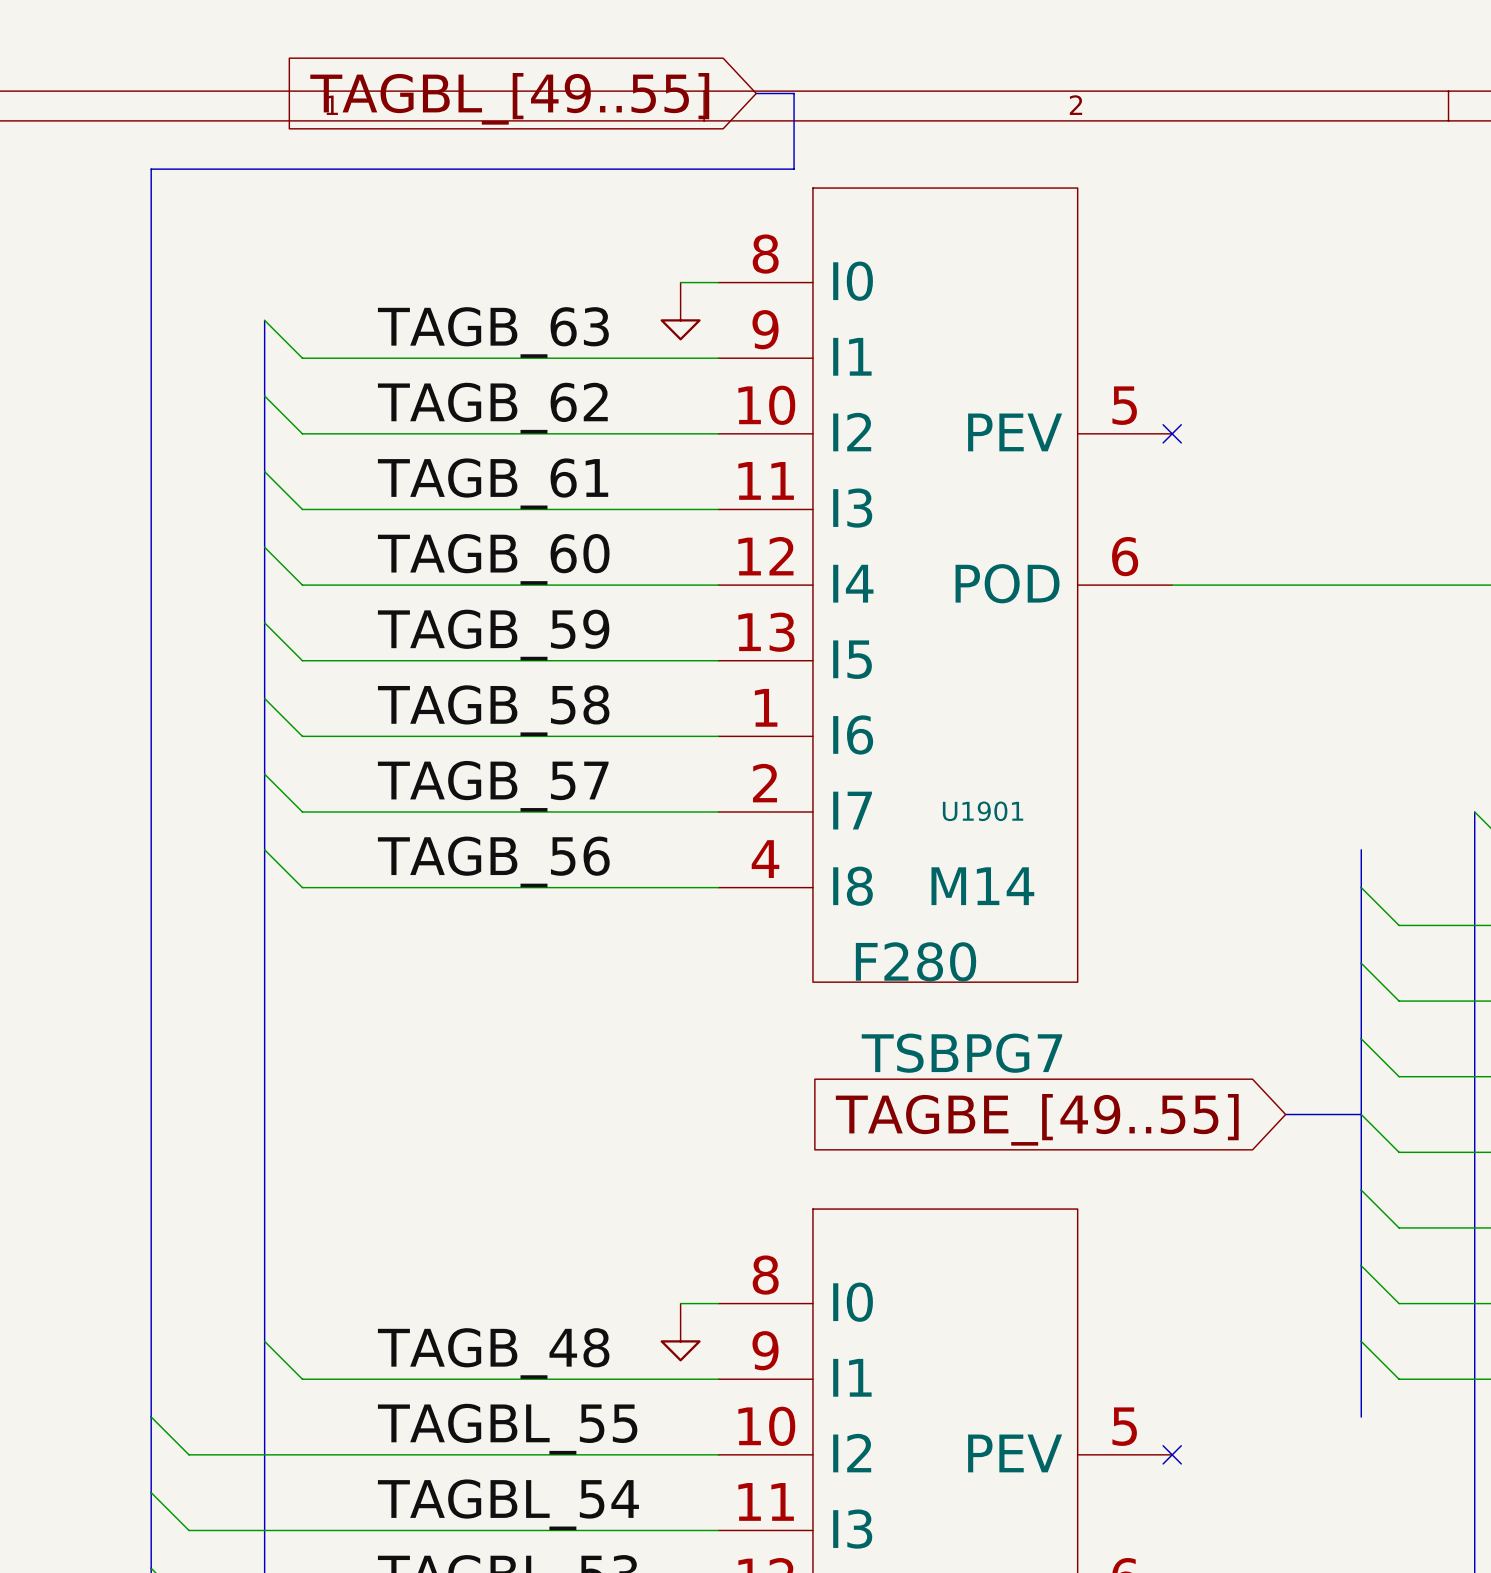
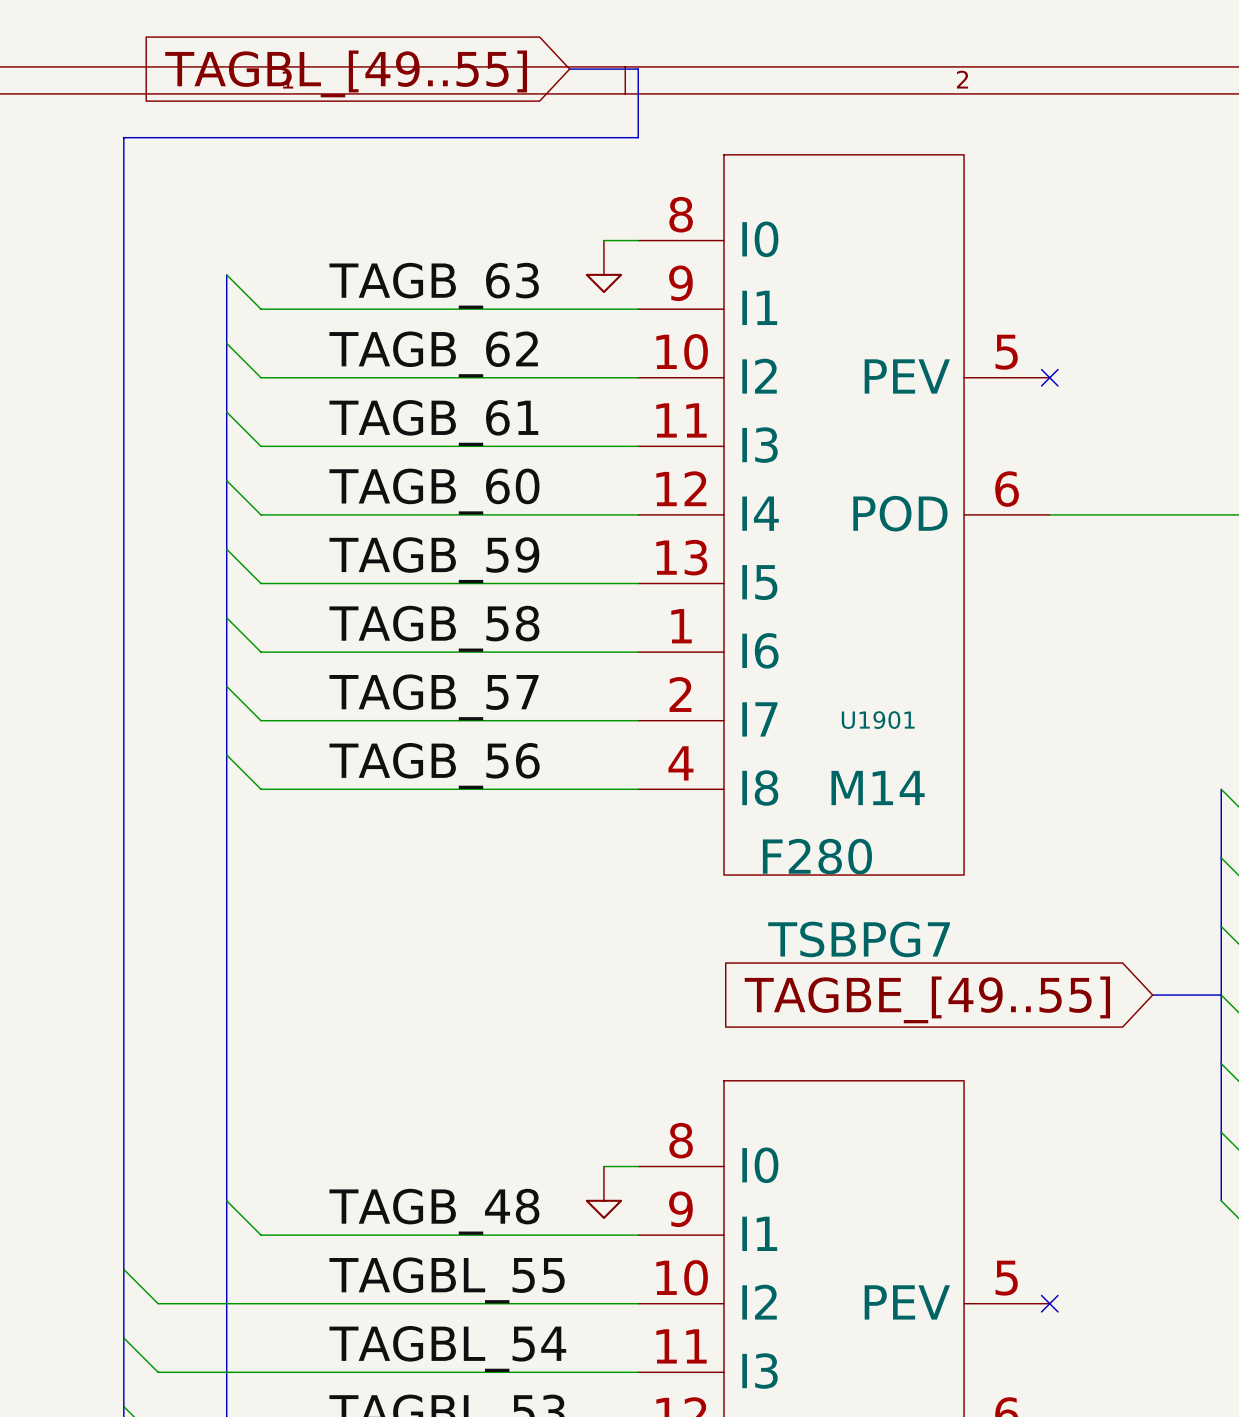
bus: (756, 93) (794, 93) (794, 169) (718, 169) -> (569, 69) (638, 69) (638, 137)
global label position: TAGBL_[49..55] (509, 98) -> TAGBL_[49..55] (346, 73)
bus: (1361, 849) (1361, 887) -> none
bus: (1361, 1341) (1361, 1417) -> none

